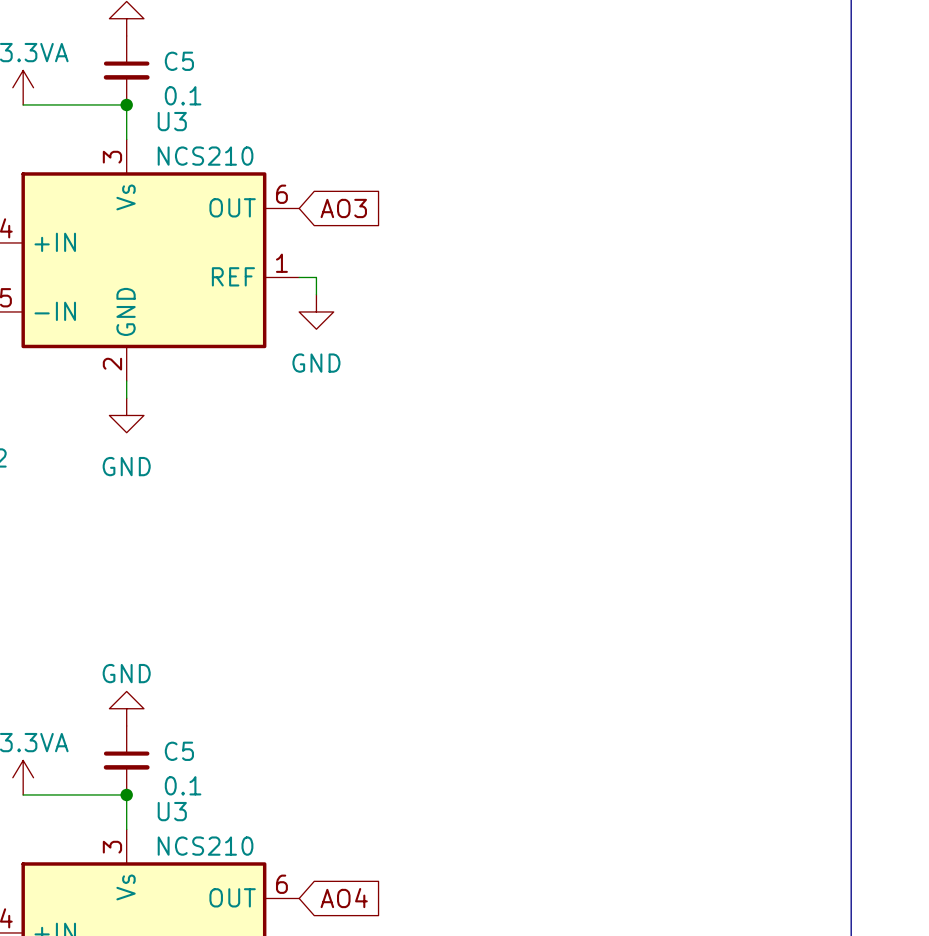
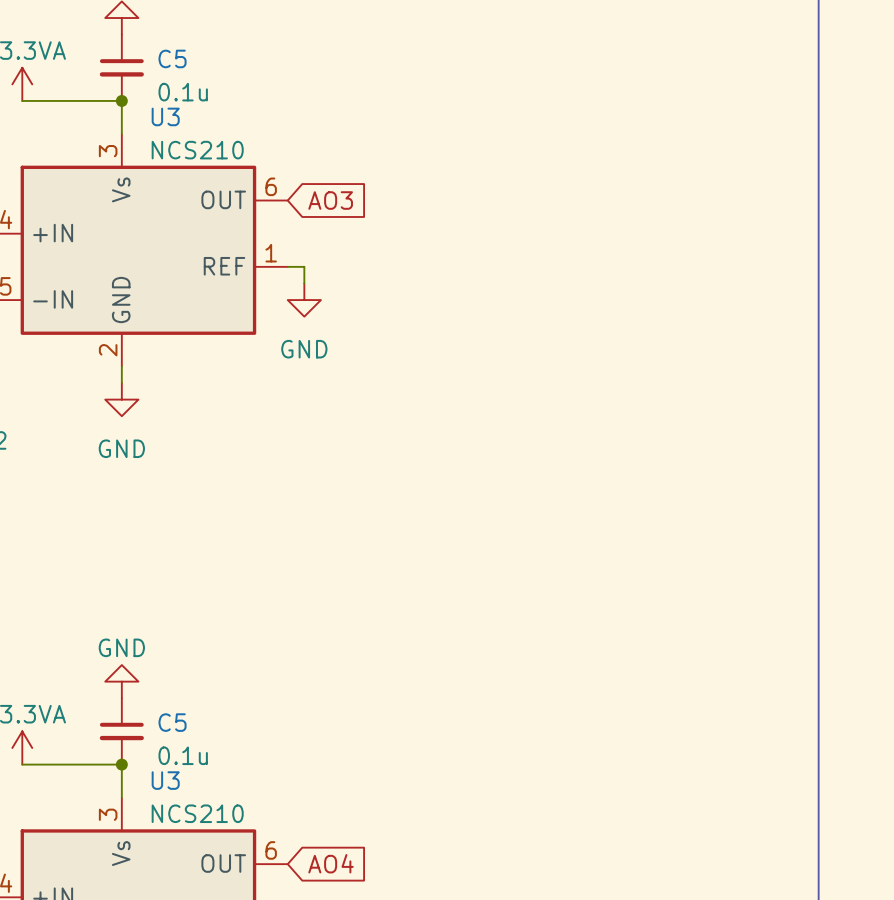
C5 value: 0.1 (183, 95) -> 0.1u (183, 92)
C5 value: 0.1 (183, 785) -> 0.1u (183, 755)

